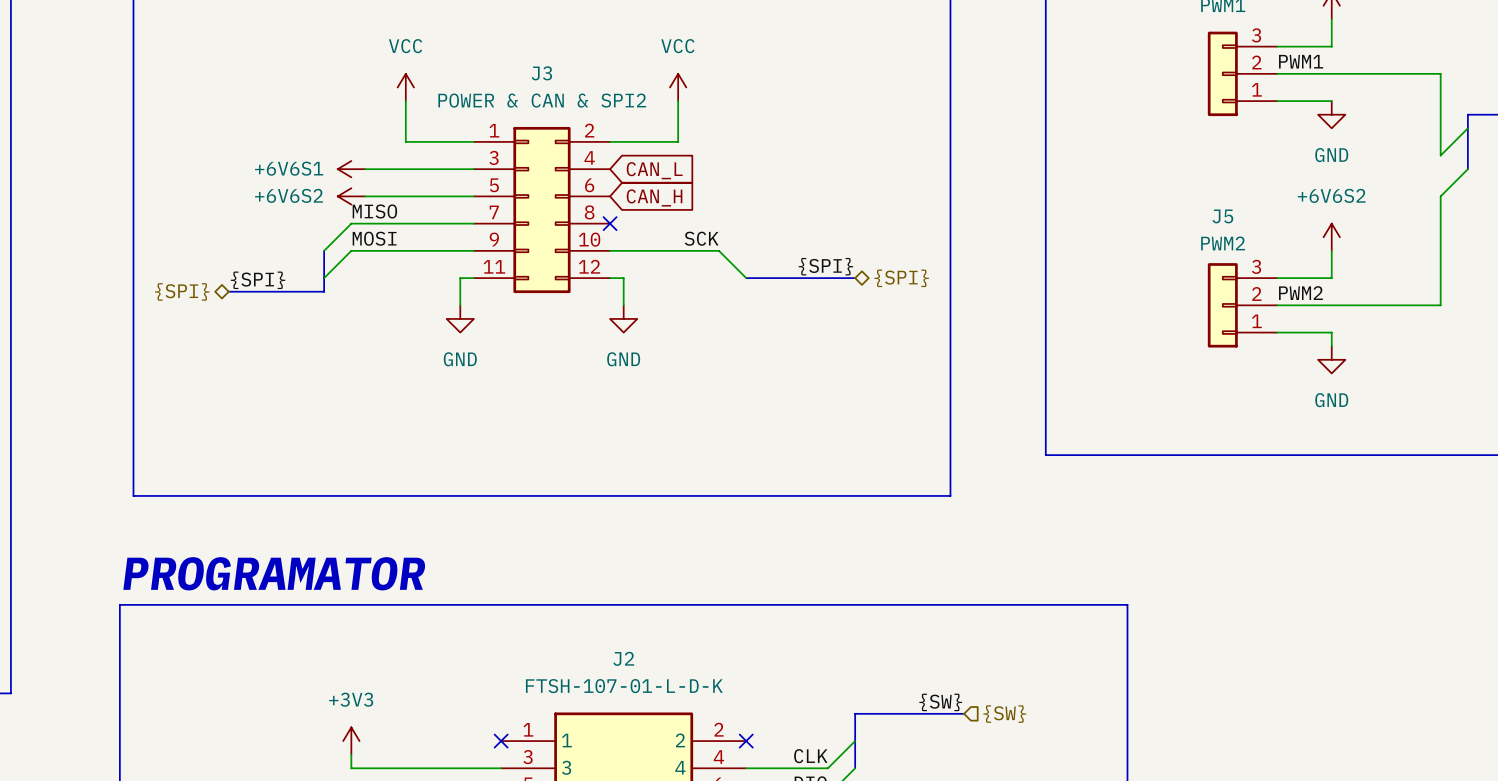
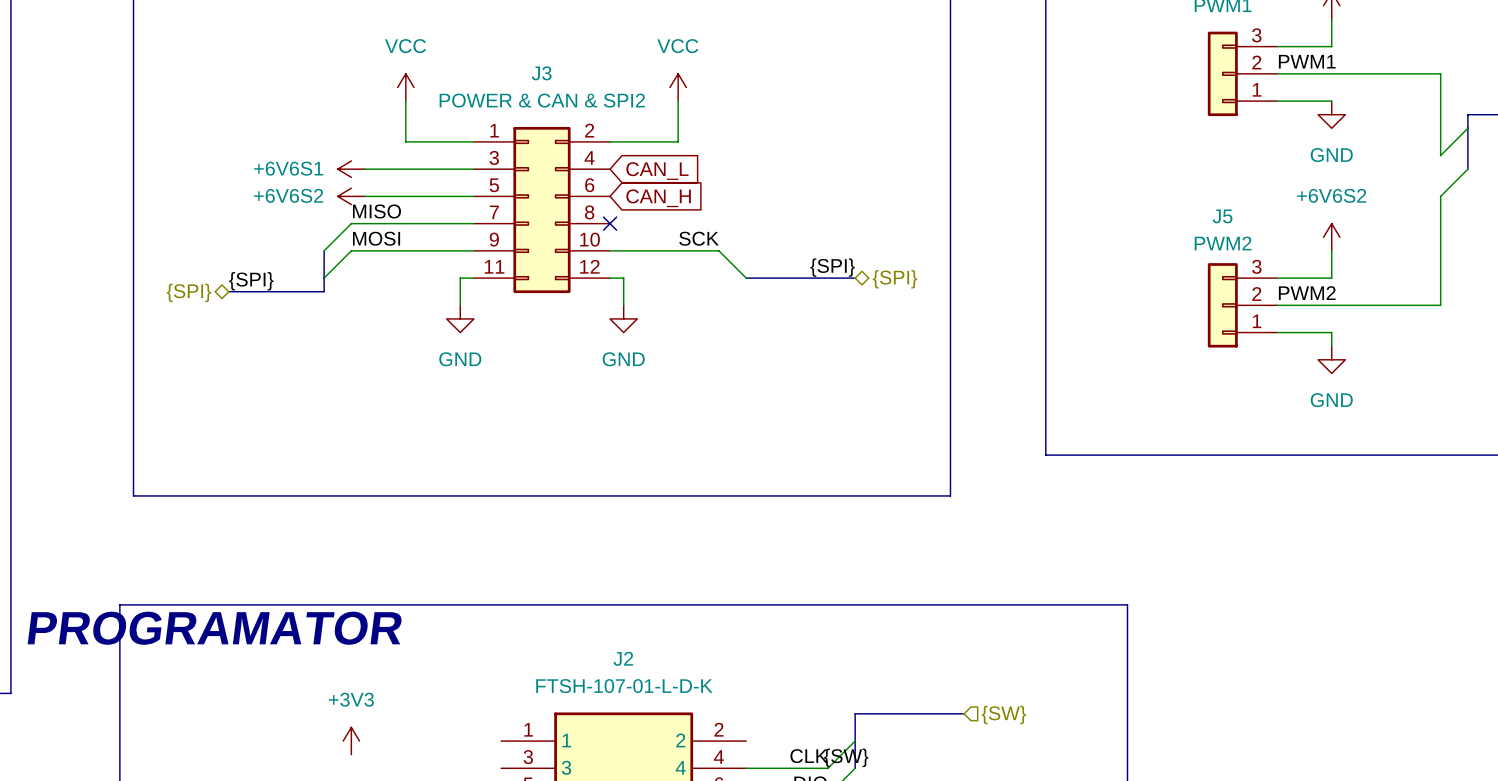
text position: PROGRAMATOR (274, 573) -> PROGRAMATOR (214, 628)
label position: {SW} (940, 702) -> {SW} (846, 757)
no-connect mark: (501, 741) -> none
no-connect mark: (746, 741) -> none
wire: (351, 754) (351, 768) (501, 768) -> none

